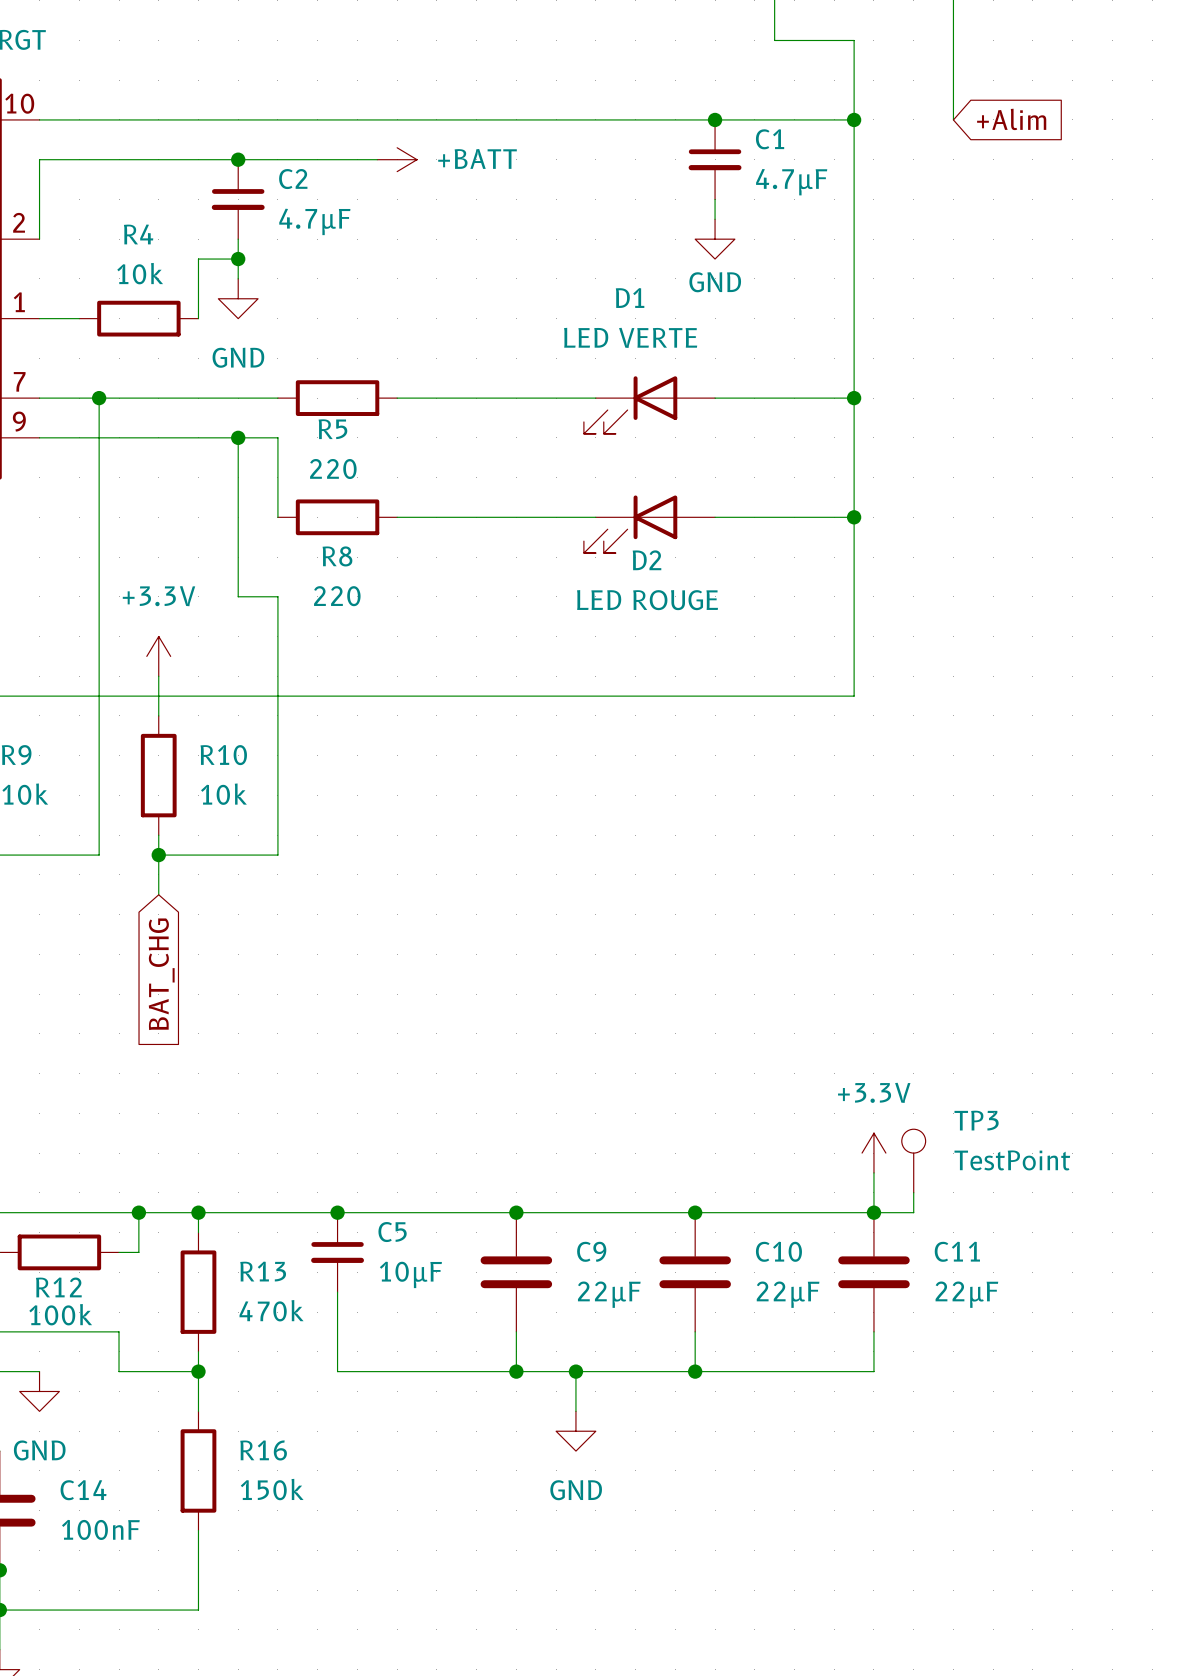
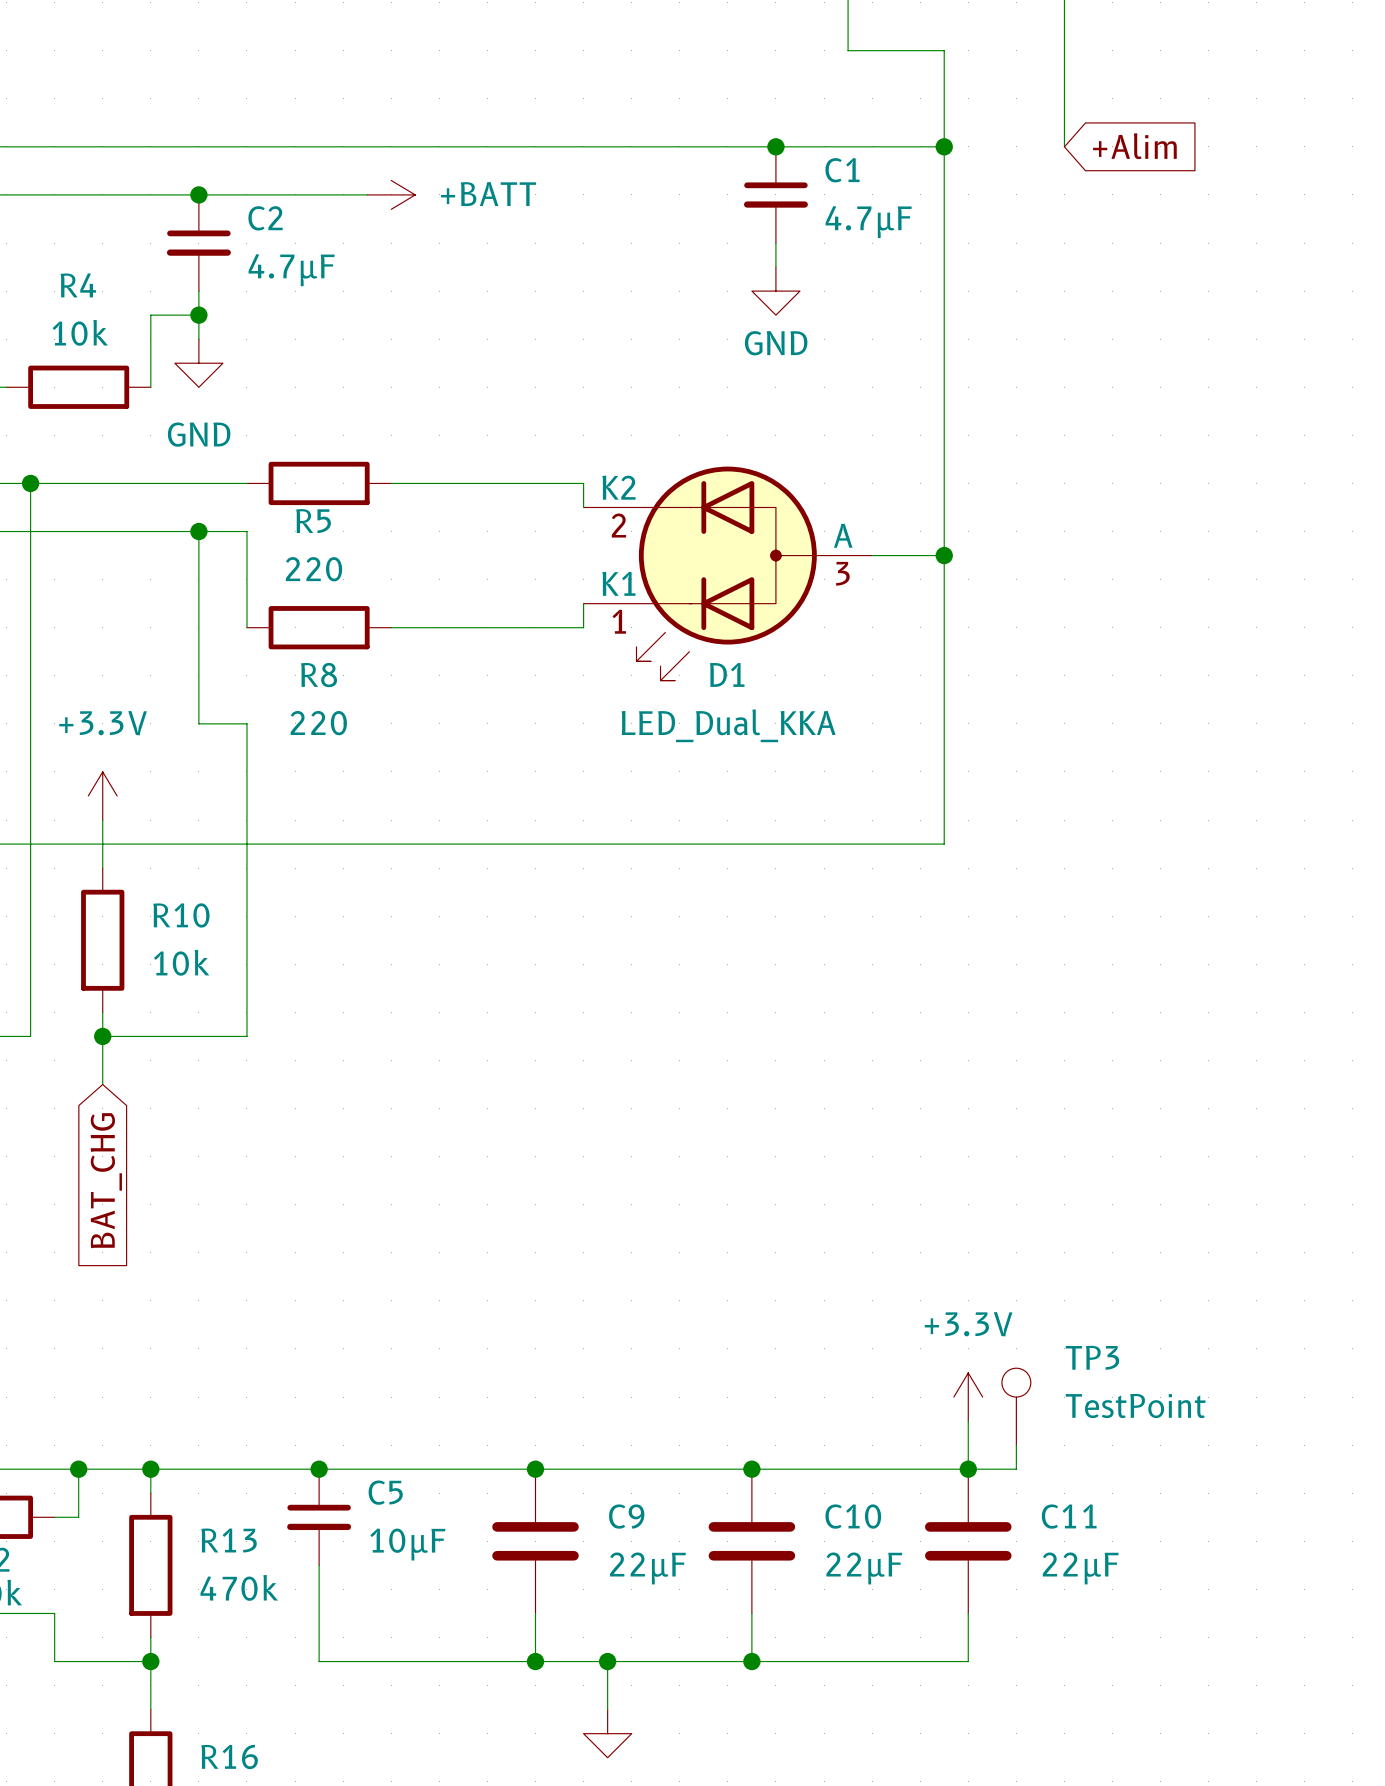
D1 name position: D1 (630, 298) -> D1 (727, 674)
D1 value: LED VERTE (630, 337) -> LED_Dual_KKA (728, 725)
D1 symbol: [583, 376, 716, 434] -> [583, 466, 873, 681]
wire: (556, 398) (595, 398) -> (583, 483) (583, 507)
wire: (715, 398) (854, 398) -> none
junction: (854, 398) -> none
wire: none -> (872, 555) (944, 555)
junction: none -> (944, 555)
wire: (556, 517) (595, 517) -> (583, 627) (583, 603)
wire: (715, 517) (854, 517) -> none
junction: (854, 517) -> none
D2: LED ROUGE (649, 524) -> none

